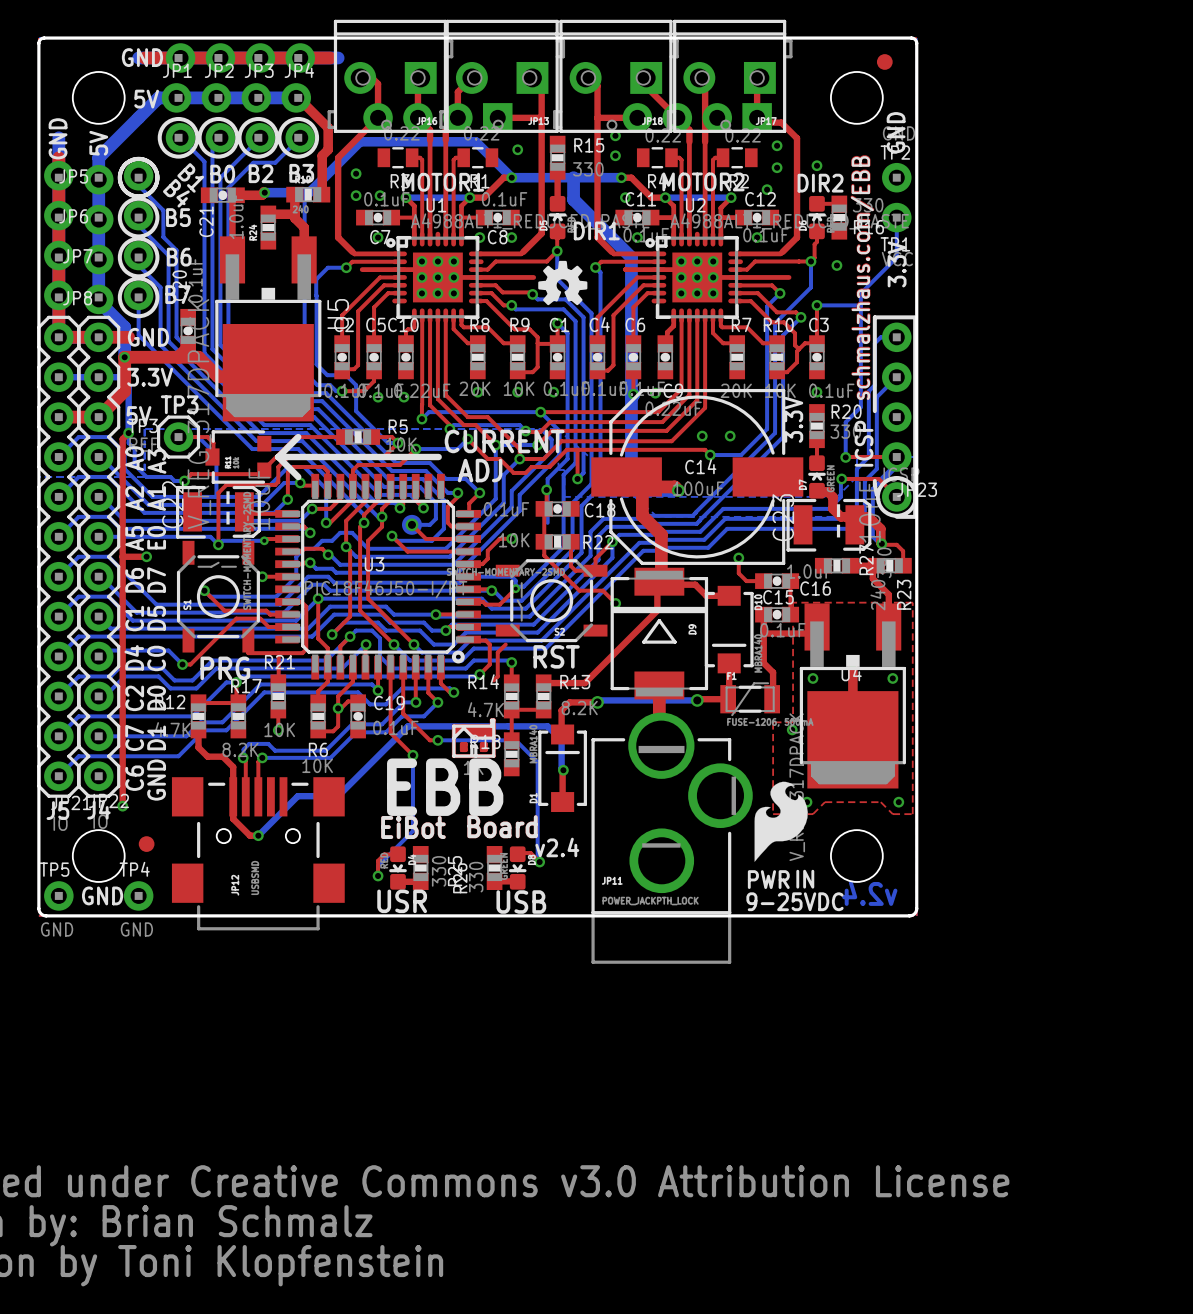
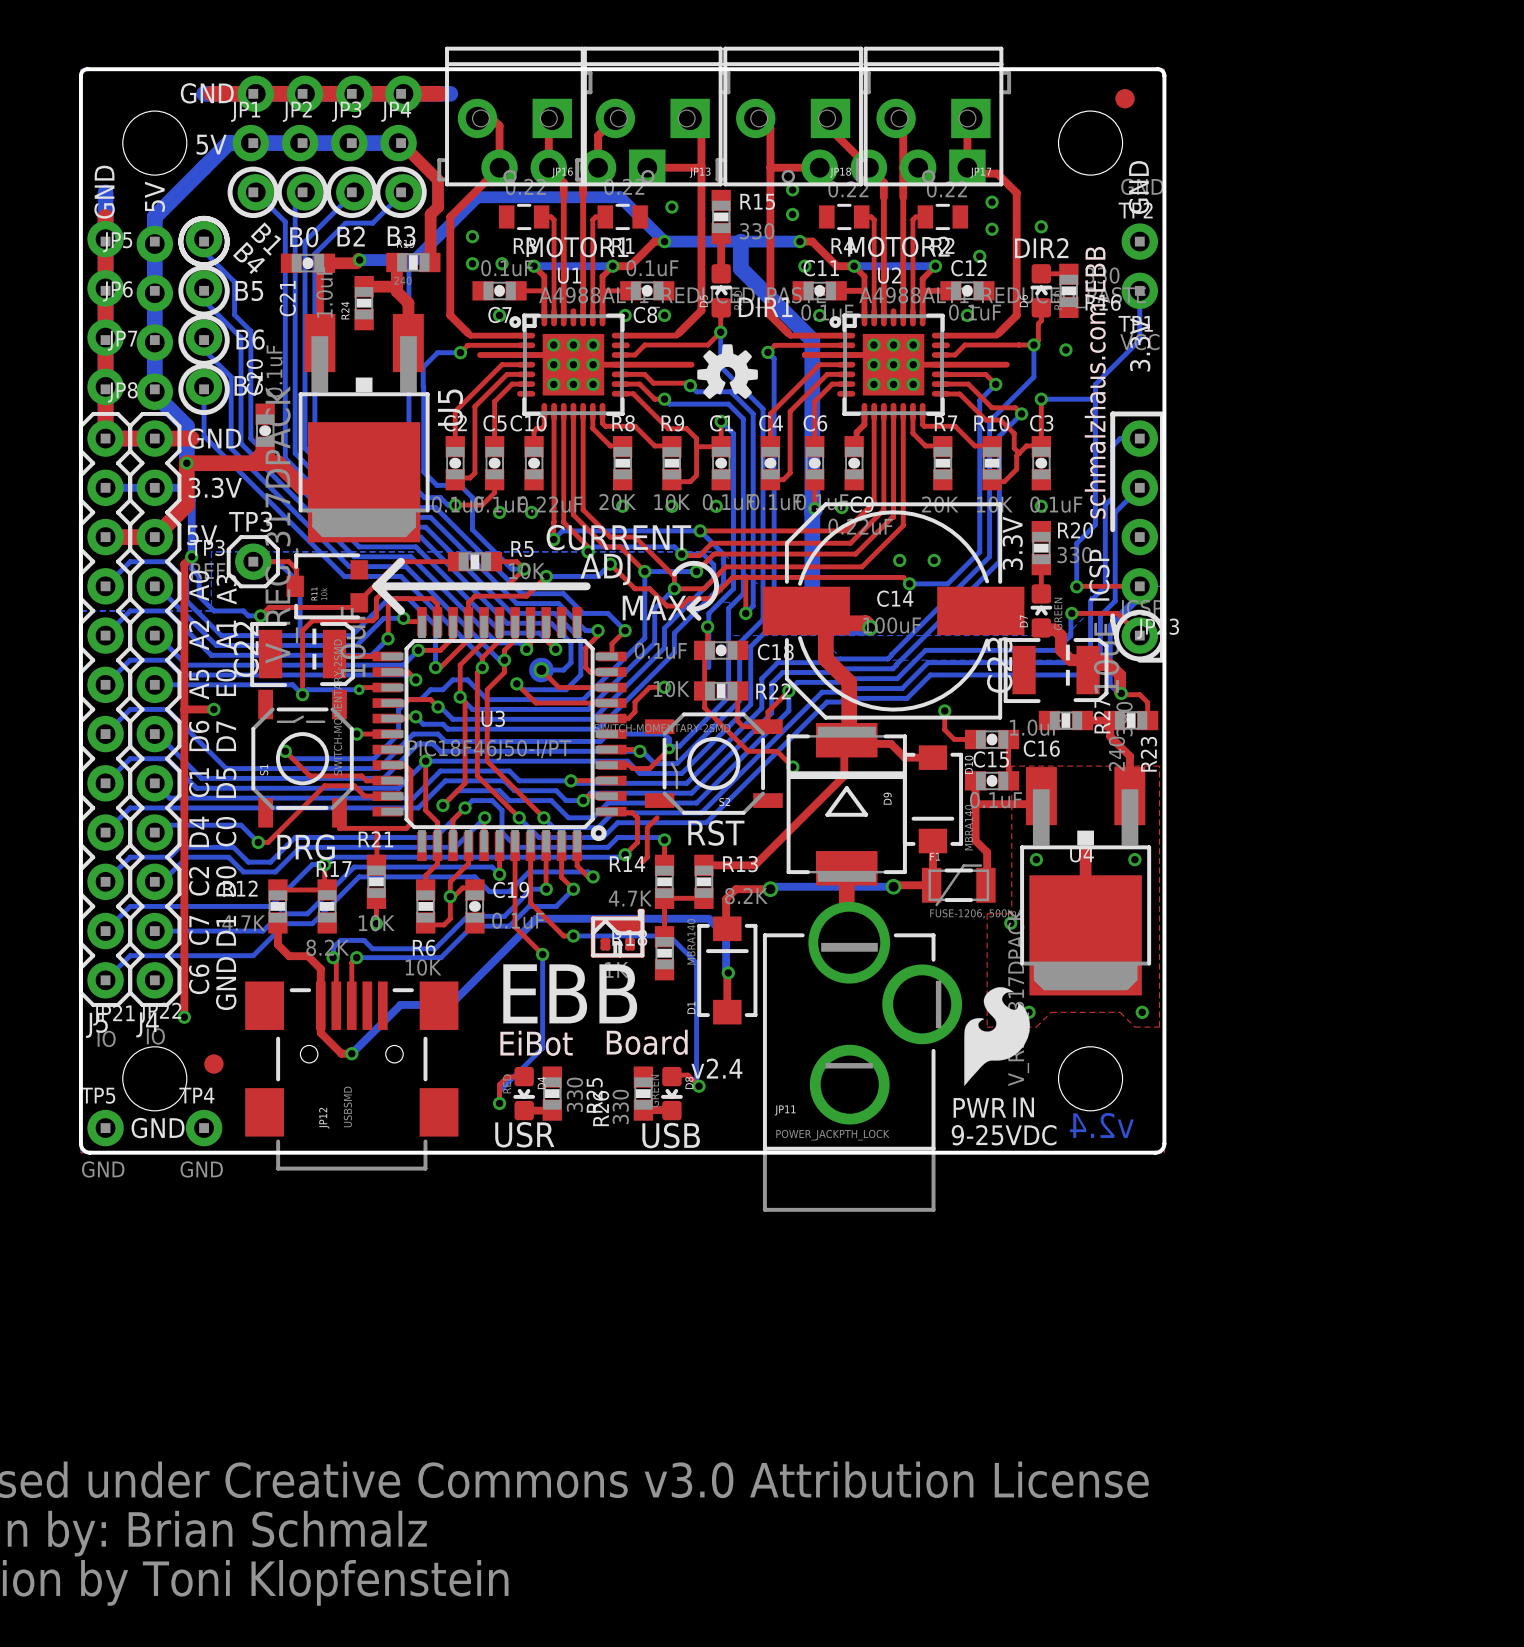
text: none -> CURRENT (618, 537)
text: CURRENT (504, 441) -> ADJ (605, 569)
line: none -> (674, 574) (685, 564) (696, 563) (707, 567) (714, 577) (715, 591) (710, 601) (700, 607) (689, 608)
line: none -> (574, 586) (586, 586)
line: none -> (699, 598) (689, 608)
text: ADJ (480, 470) -> none
text: none -> MAX (654, 607)
line: none -> (689, 608) (699, 618)

